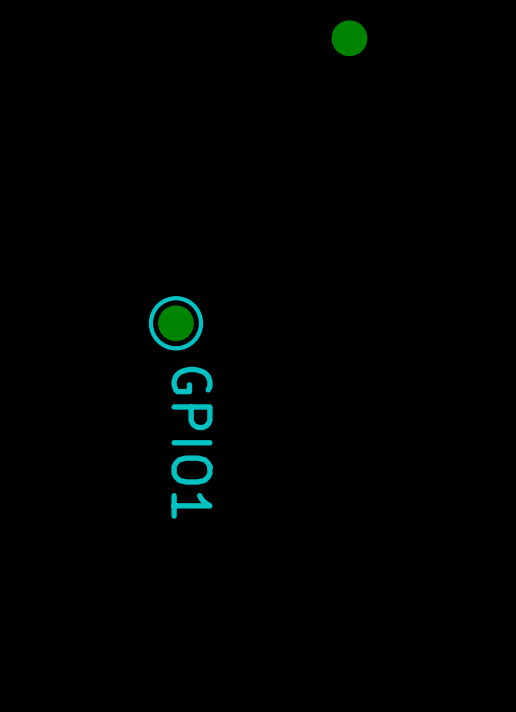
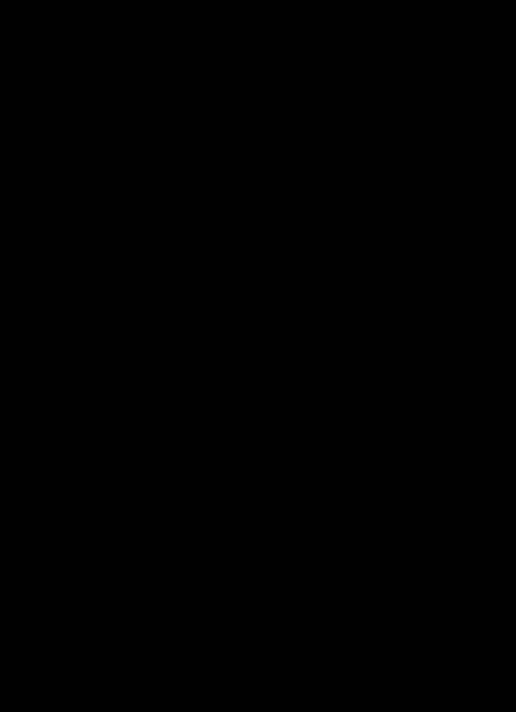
part: (349, 38) -> none
part: GPIO1 (175, 323) -> none

